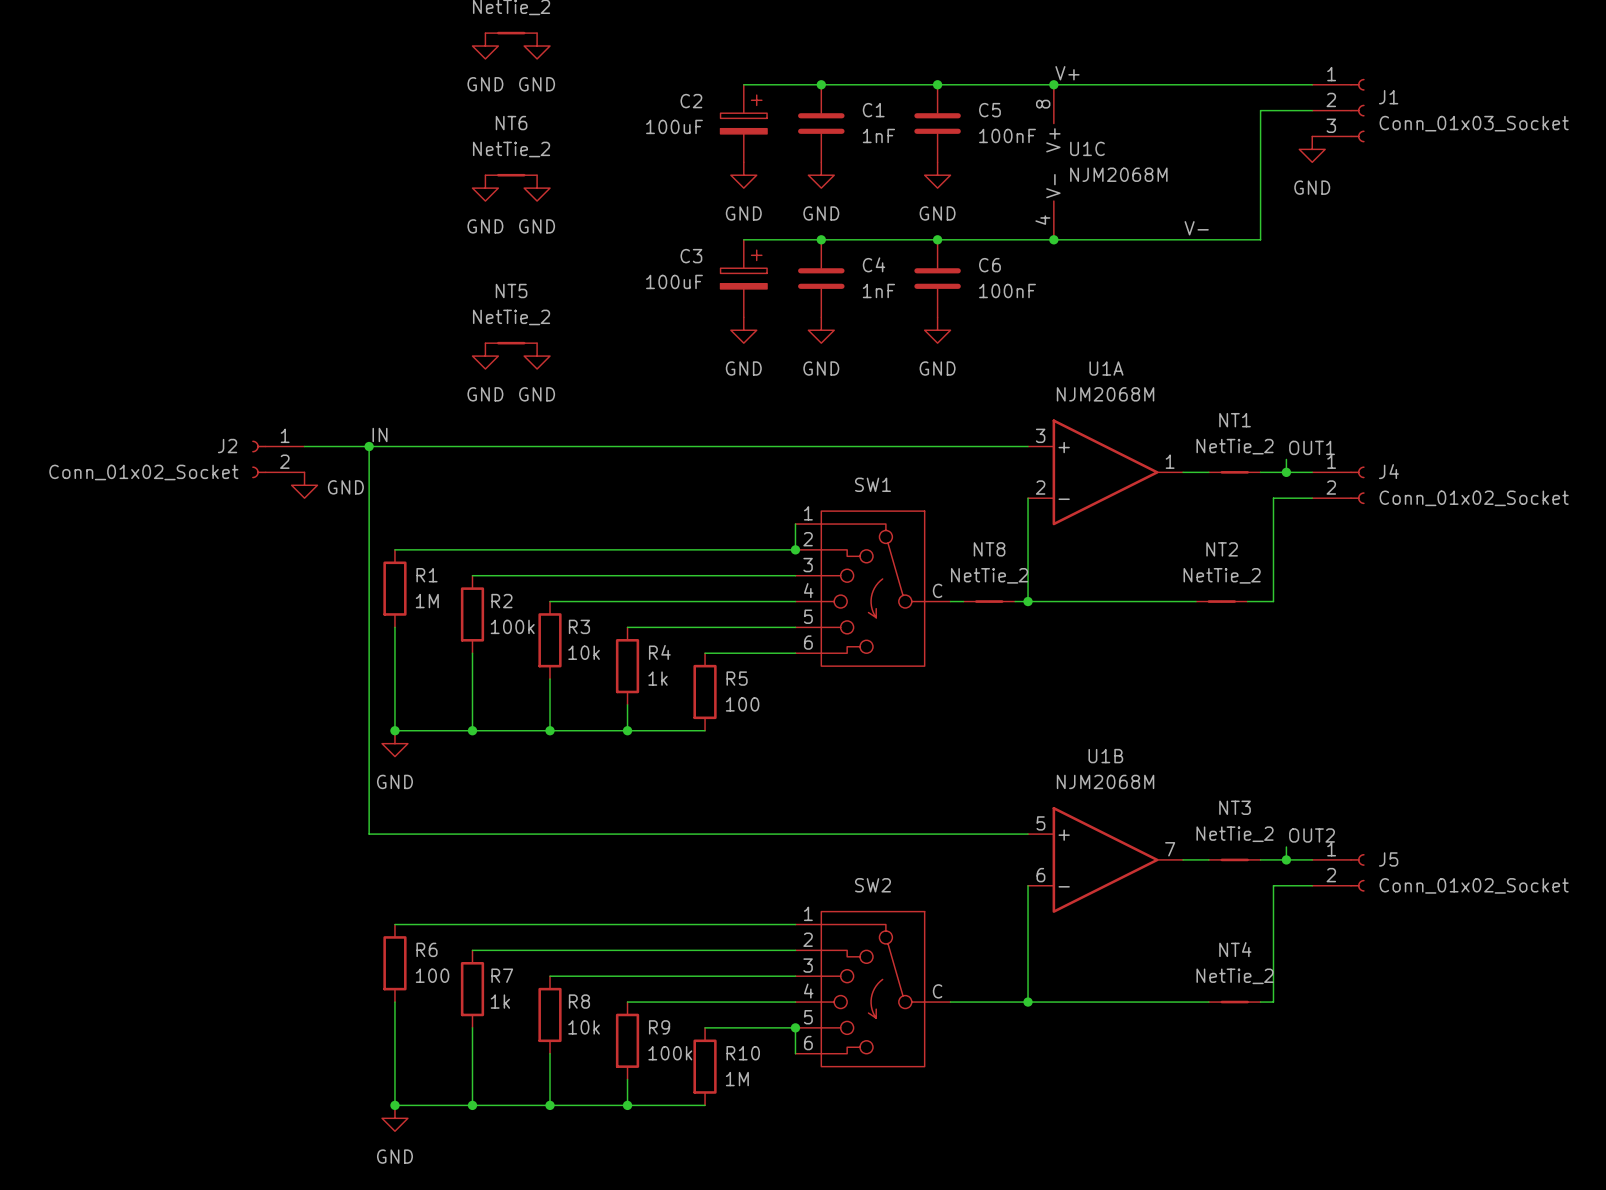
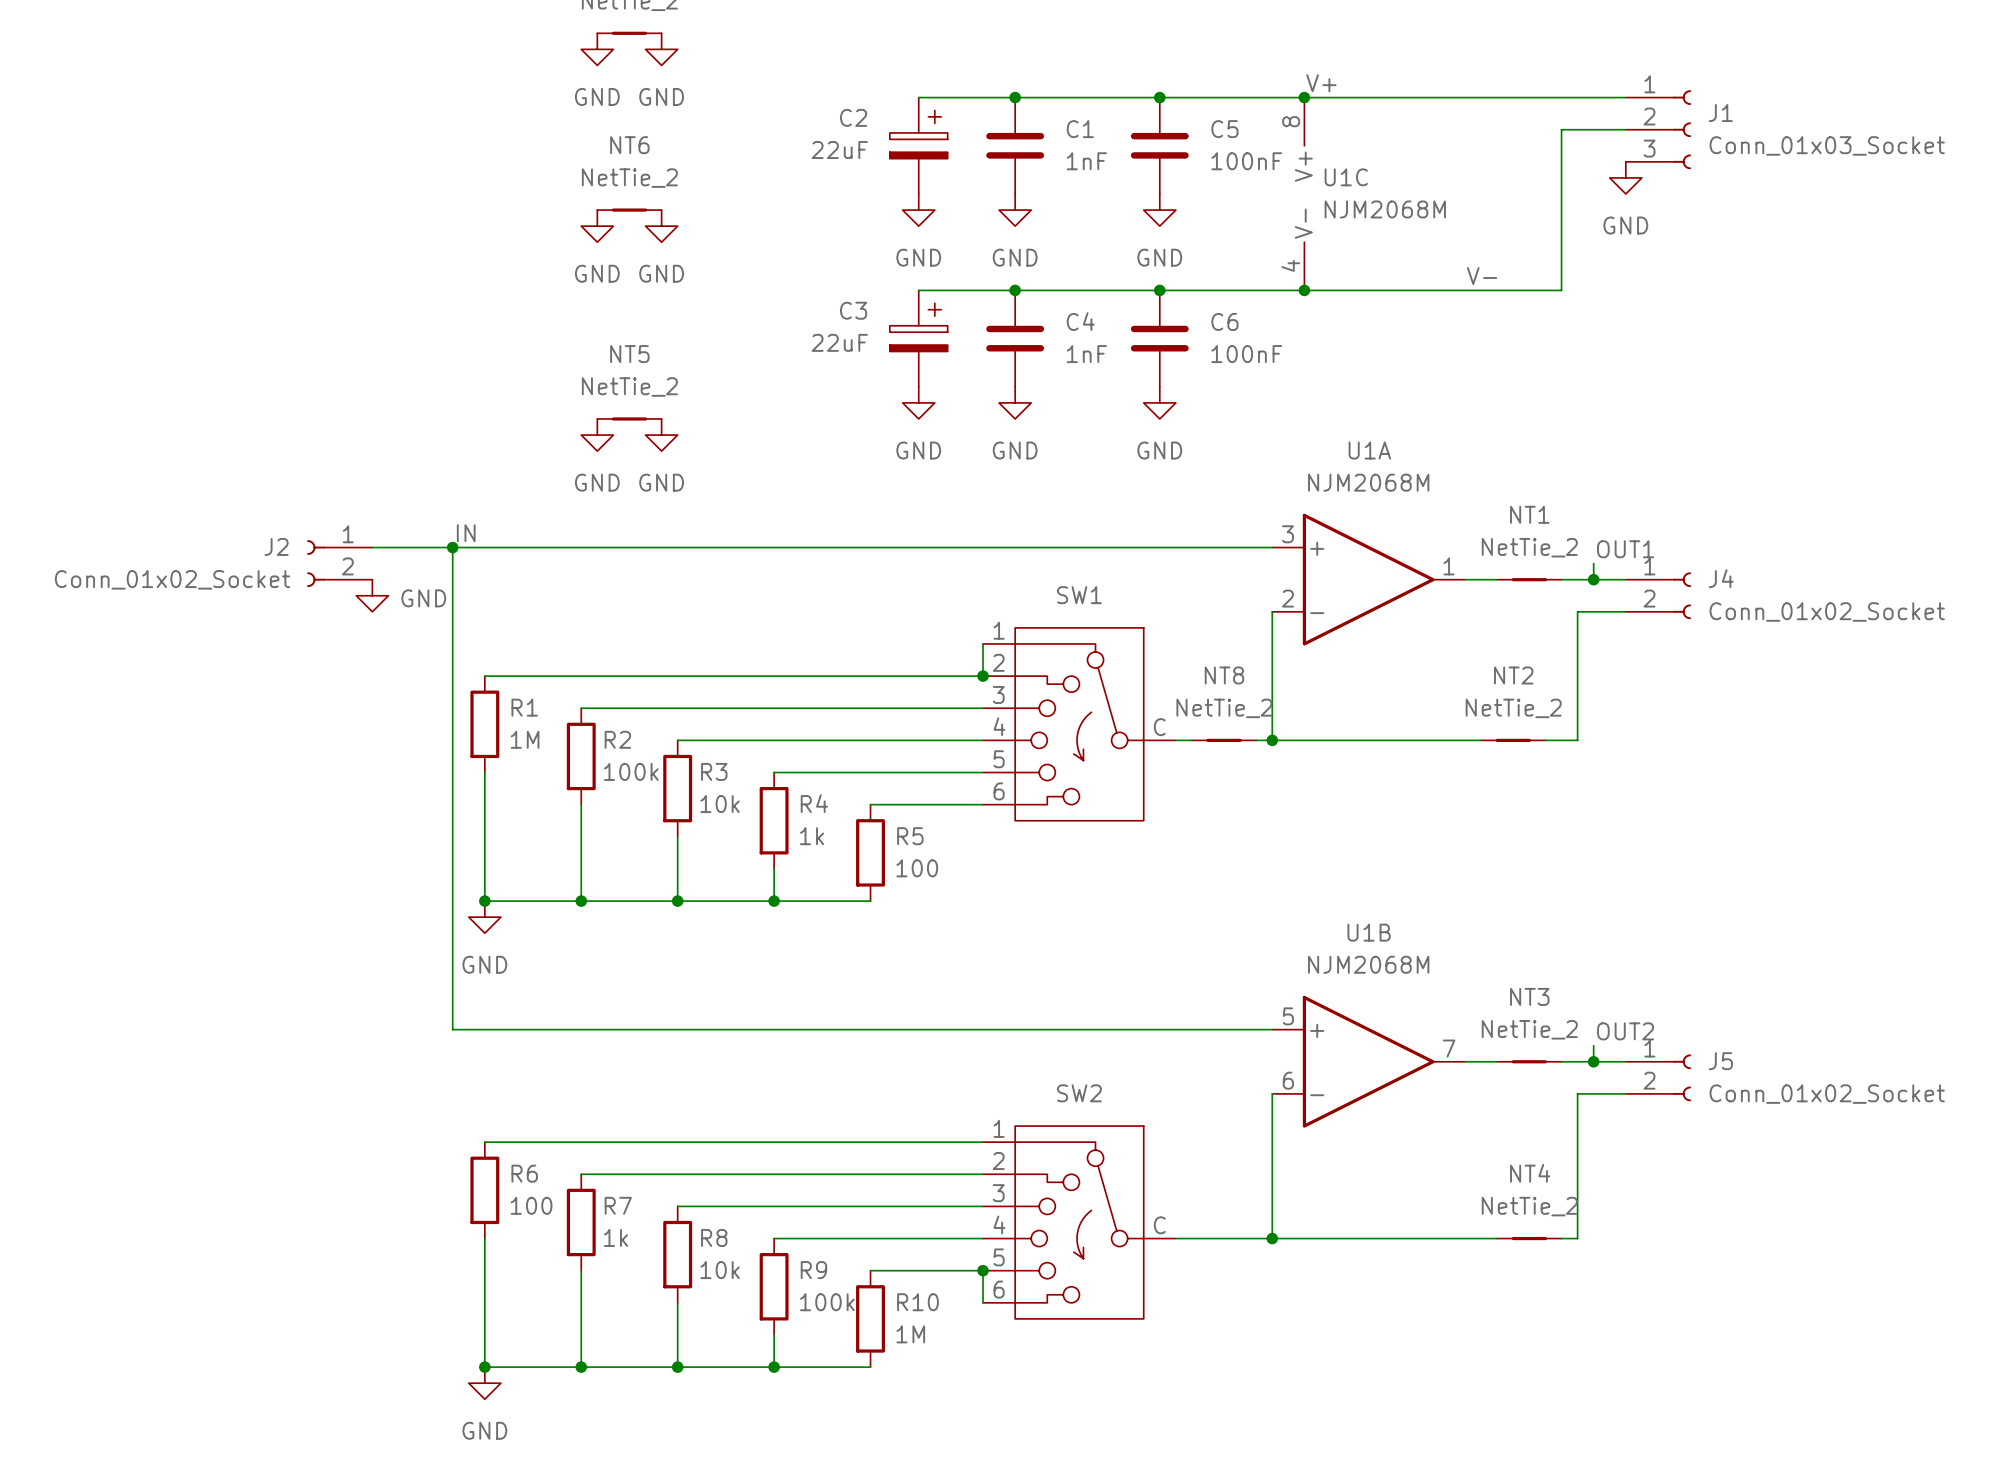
C2 value: 100uF (674, 126) -> 22uF (839, 150)
C3 value: 100uF (674, 281) -> 22uF (839, 342)

